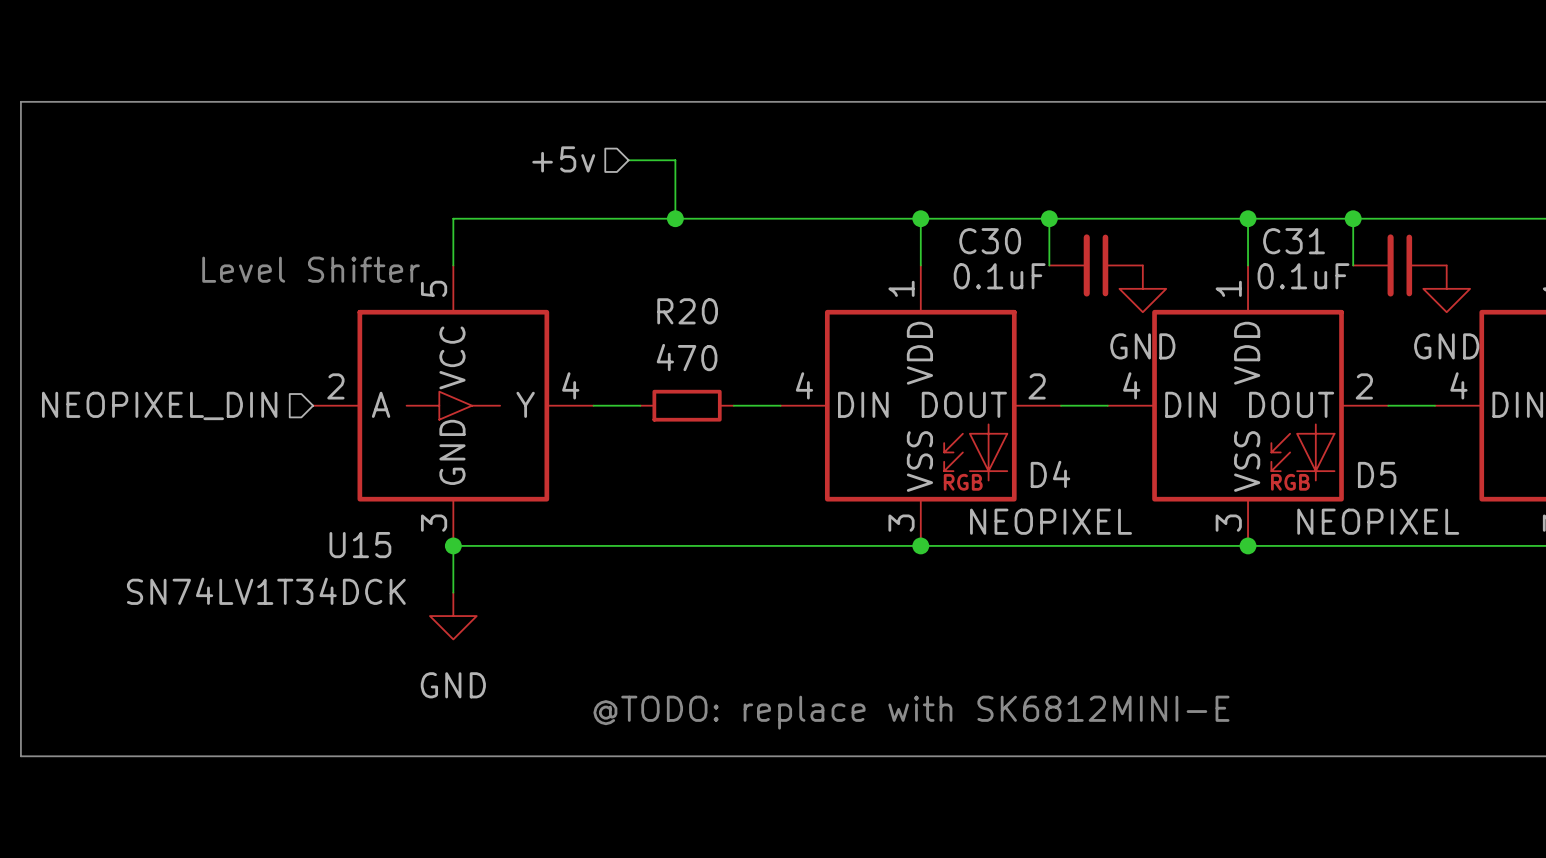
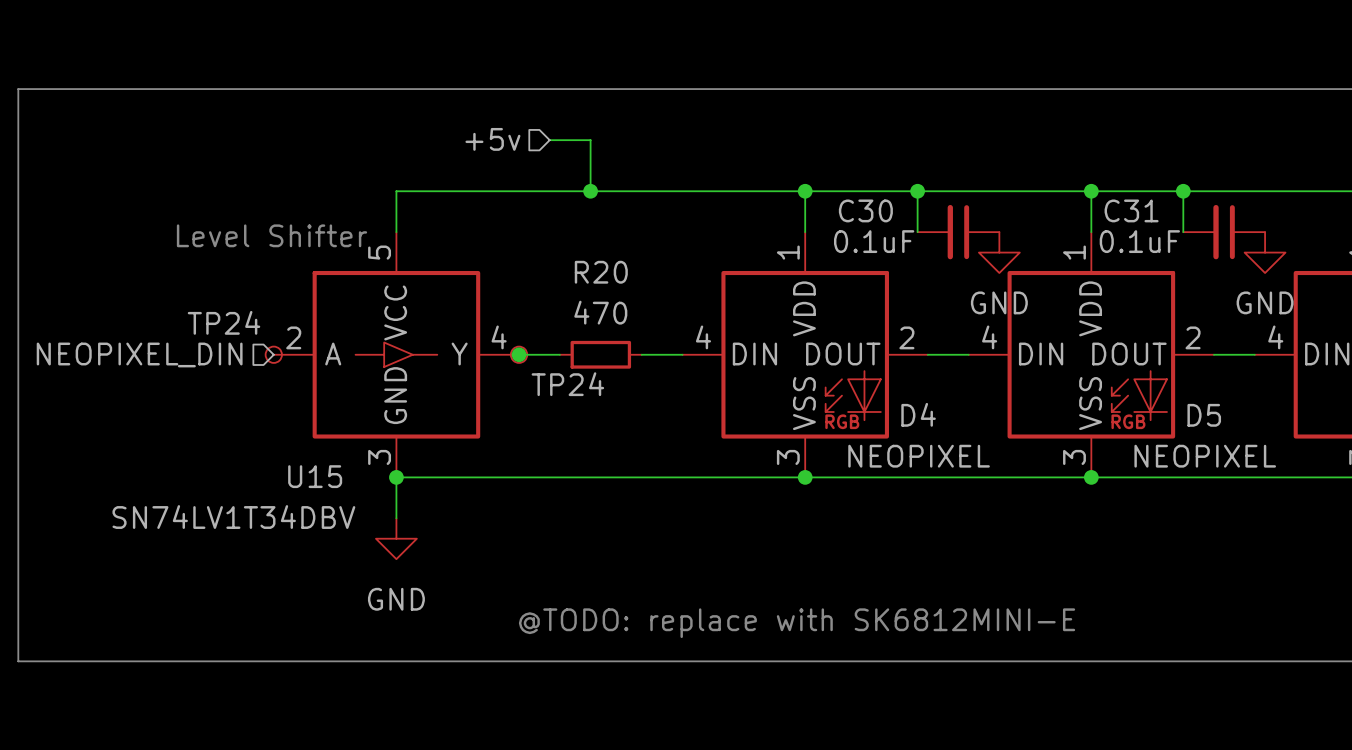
TP24: none -> (273, 354)
TP24: none -> (519, 354)
junction: none -> (519, 354)
U15 value: SN74LV1T34DCK (266, 591) -> SN74LV1T34DBV (233, 517)

